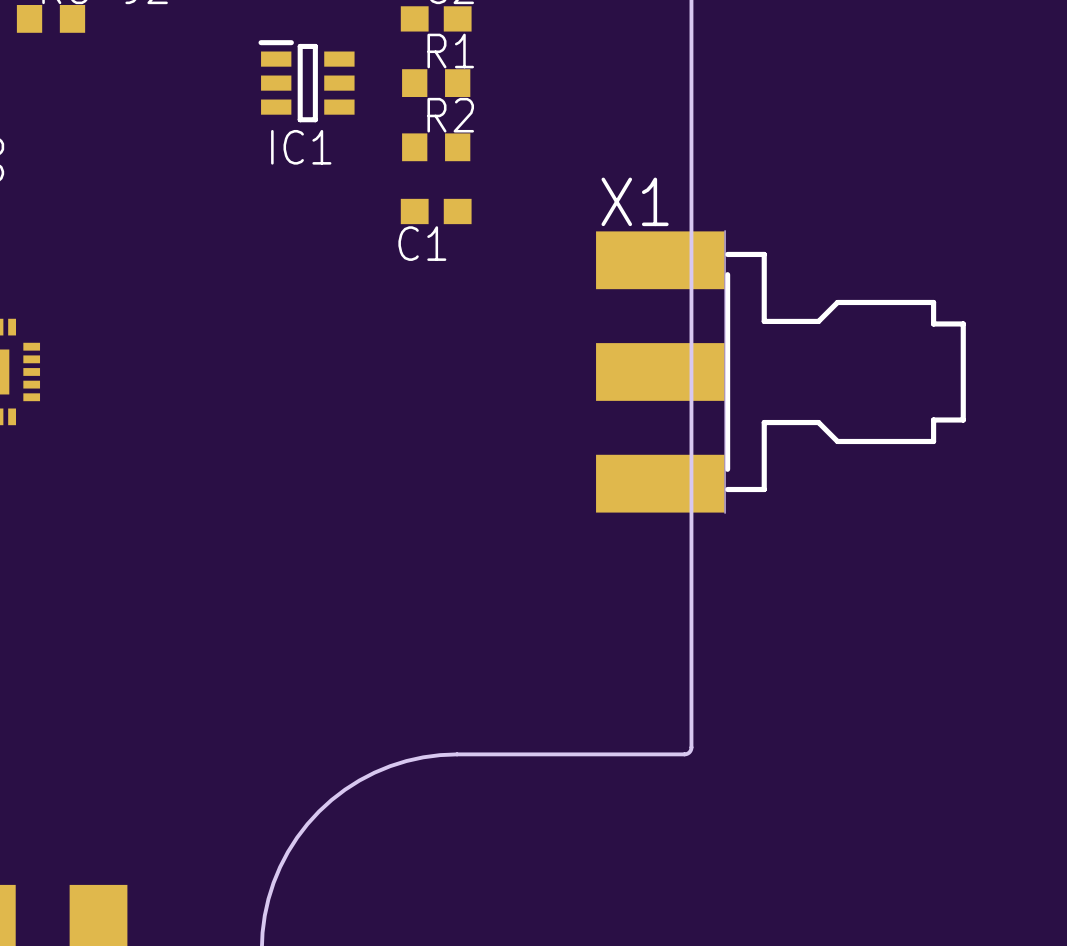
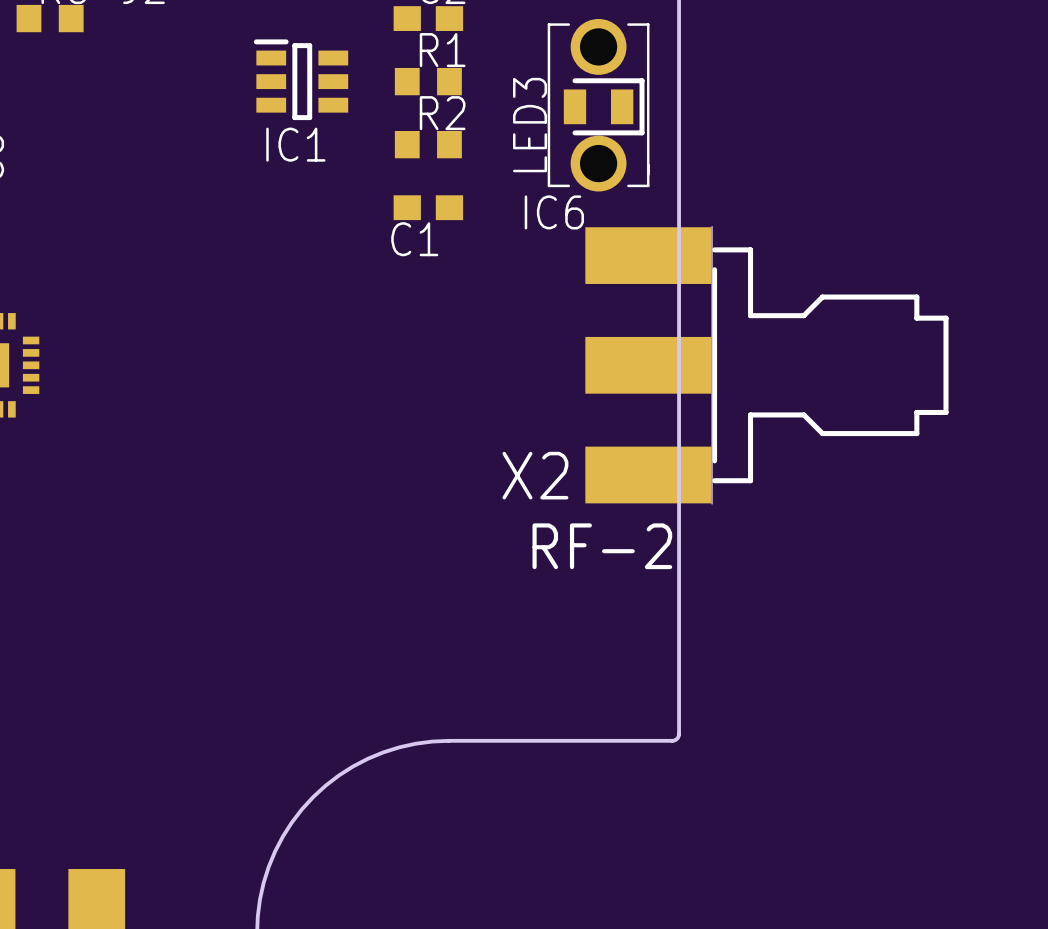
IC6: none -> (598, 105)
LED3: none -> (604, 106)
X1 name: X1 (635, 201) -> X2 (535, 475)
text: none -> RF-2 (602, 546)

